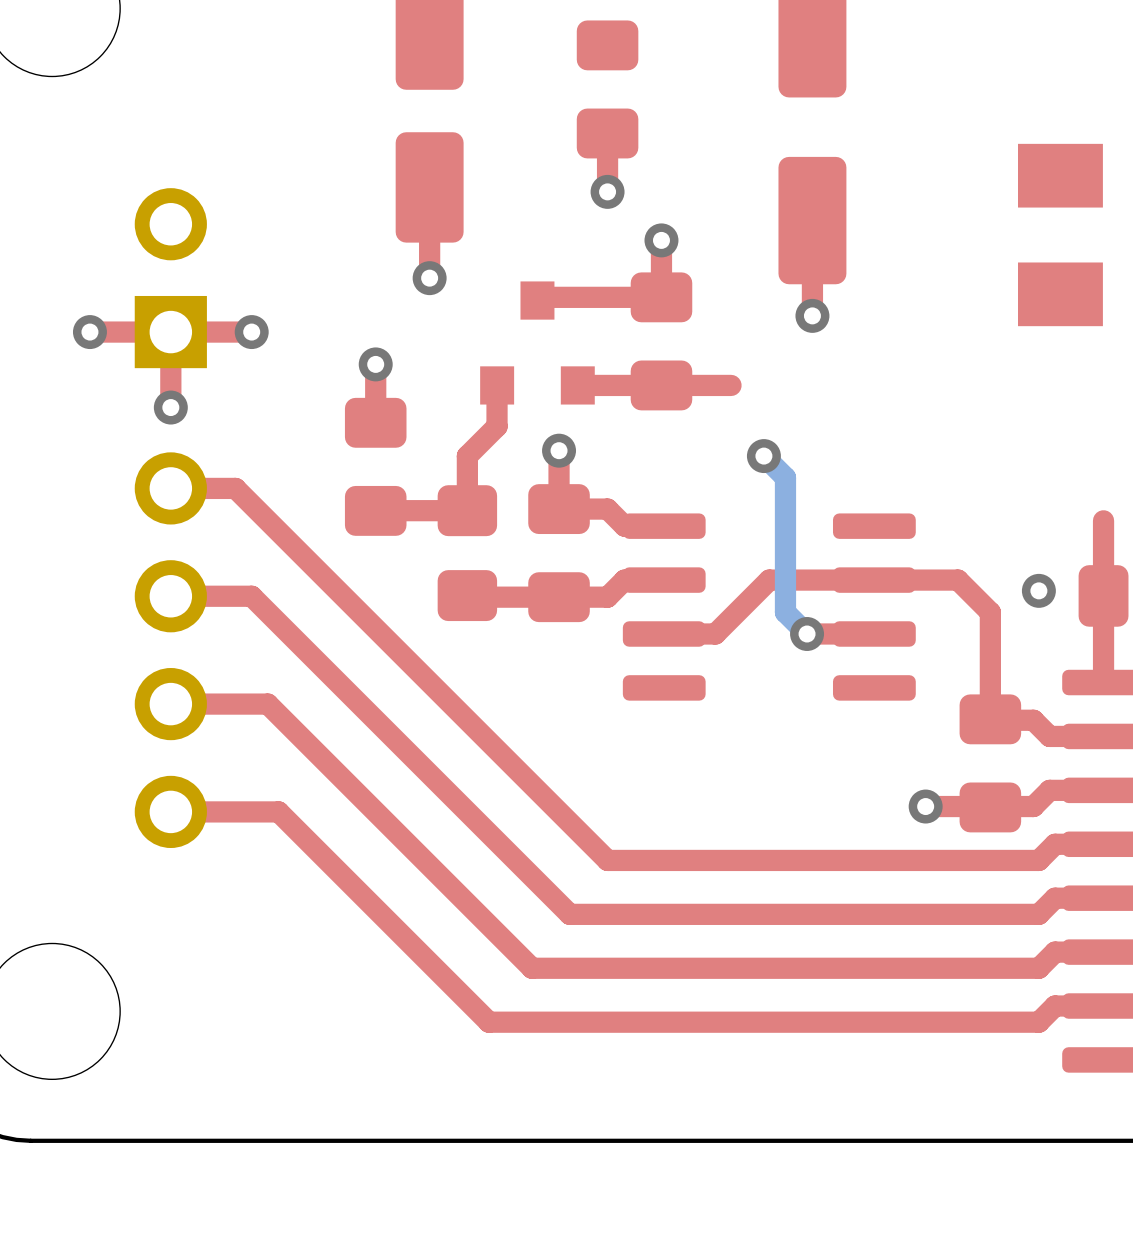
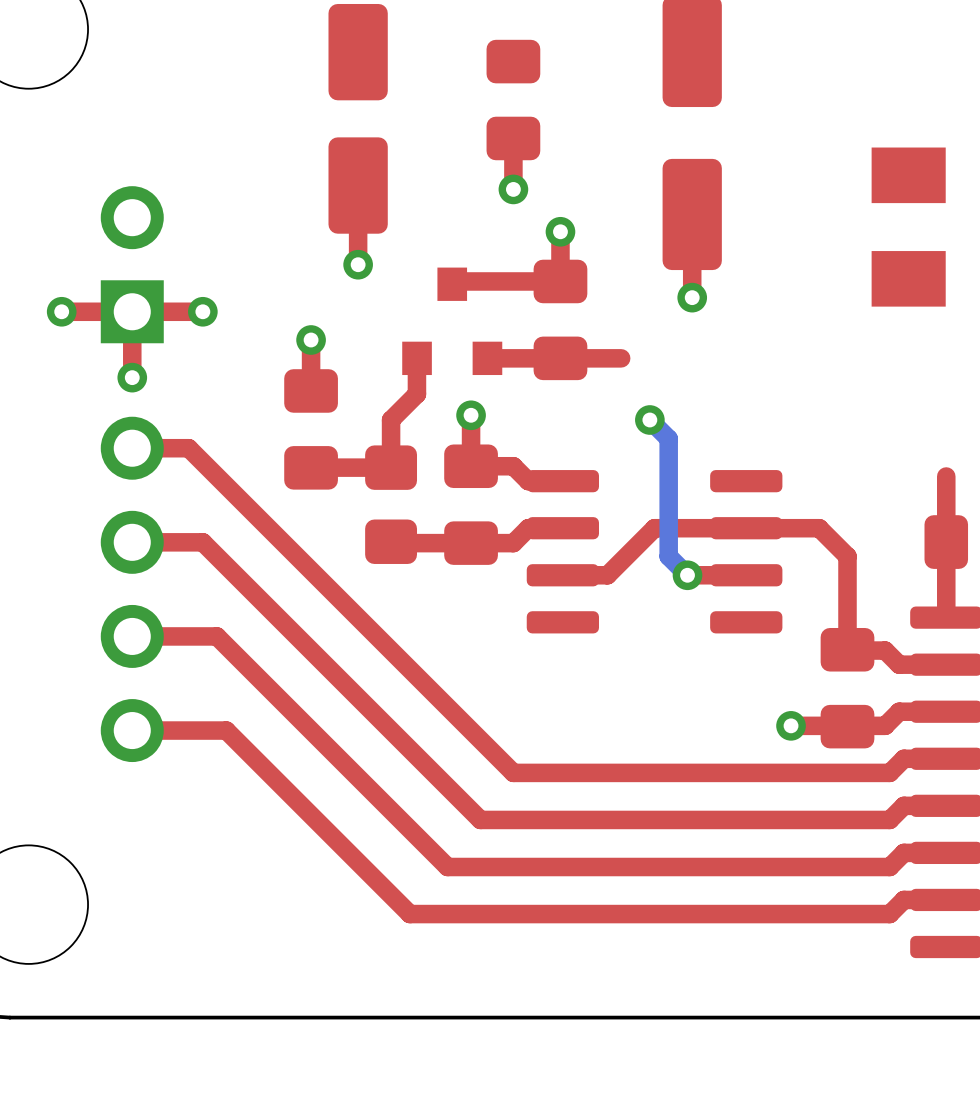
via: (1038, 590) -> none

